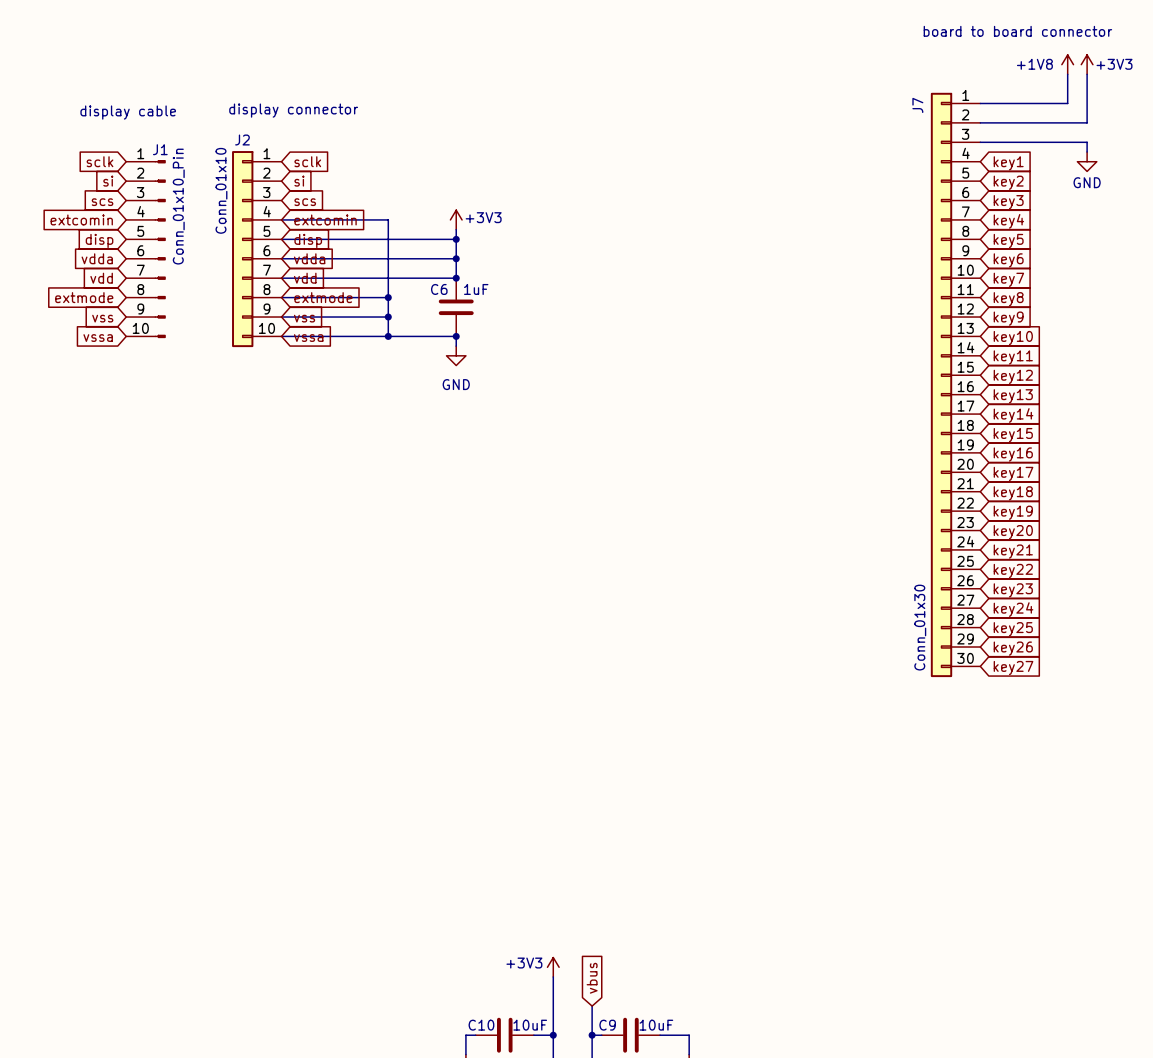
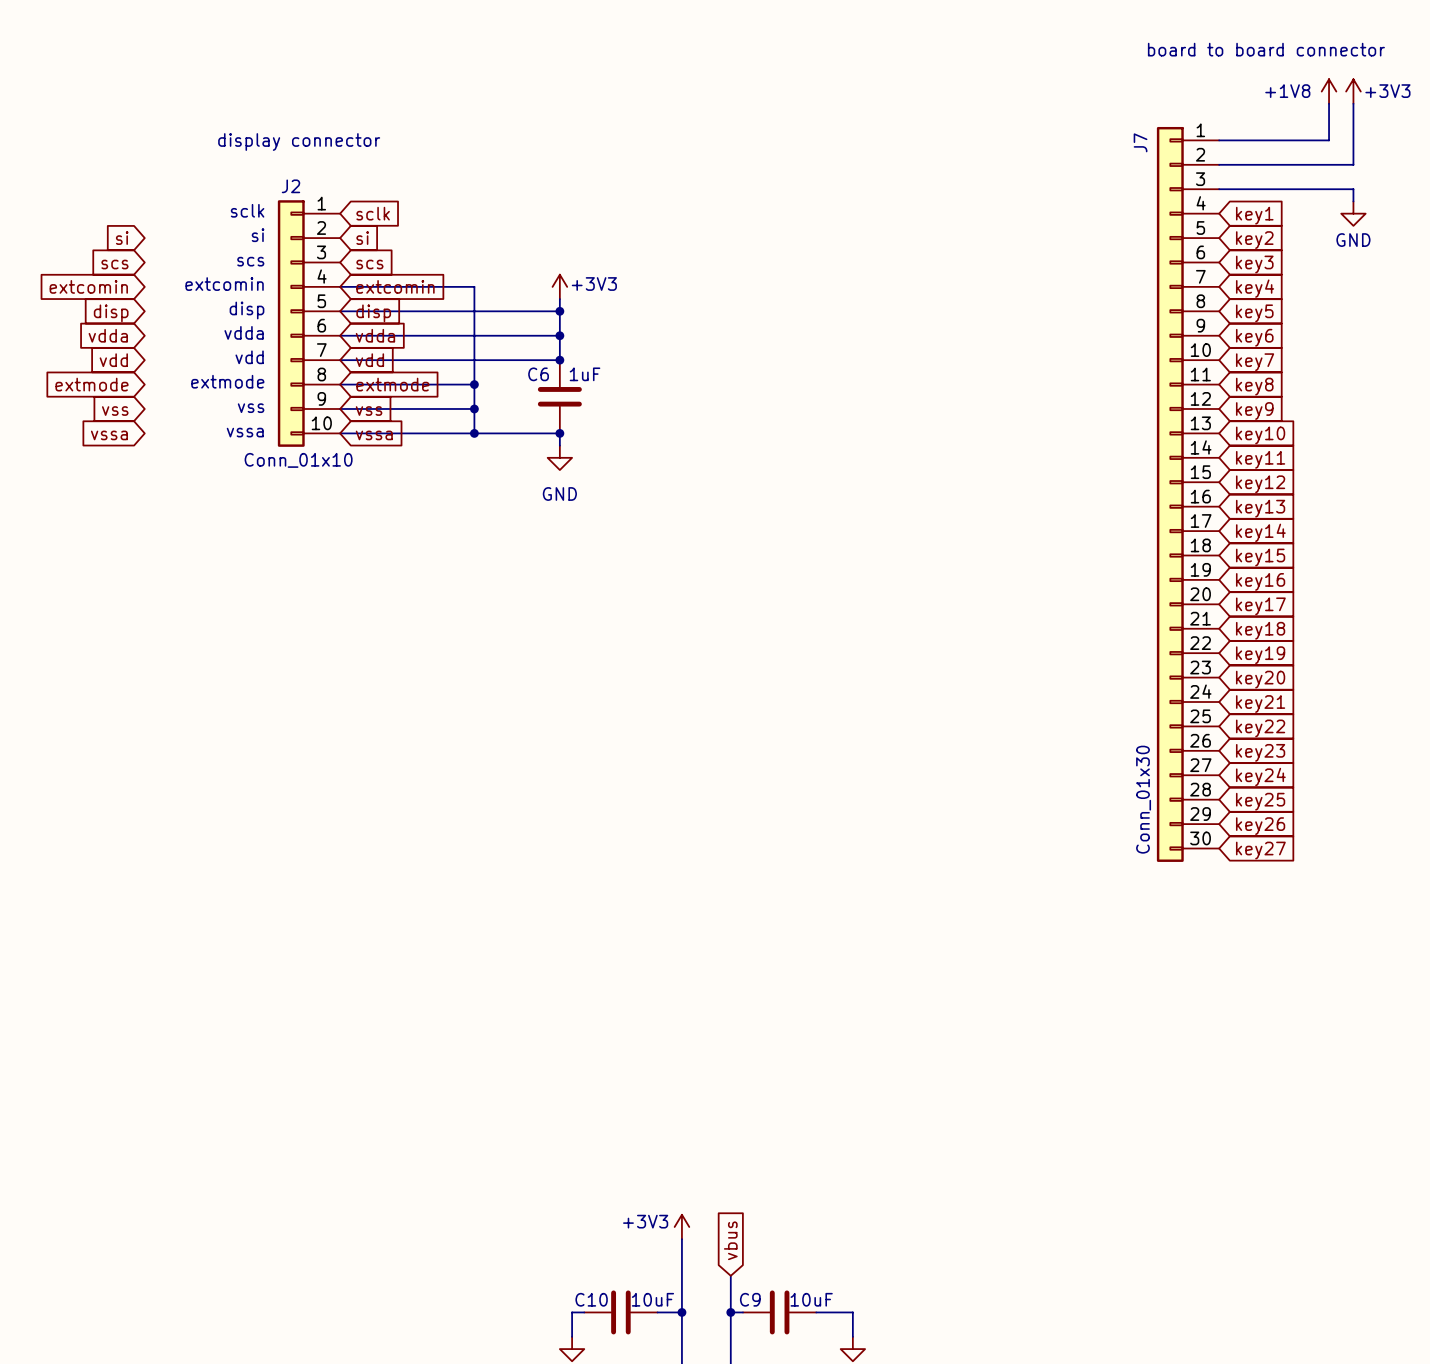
text position: display connector (293, 110) -> display connector (299, 142)
text: display cable (128, 112) -> none
text: none -> sclk (247, 210)
global label: sclk (100, 161) -> none
text: none -> si (258, 235)
J2 value rotation: 0° (221, 190) -> 90° clockwise (298, 460)
J2 value position: Conn_01x10 (221, 190) -> Conn_01x10 (298, 460)
text: none -> scs (250, 261)
text: none -> extcomin (224, 284)
text: none -> disp (246, 310)
J1: Conn_01x10_Pin (145, 249) -> none
text: none -> vdda (244, 332)
text: none -> vdd (249, 357)
text: none -> extmode (227, 381)
text: none -> vss (251, 408)
text: none -> vssa (245, 432)

